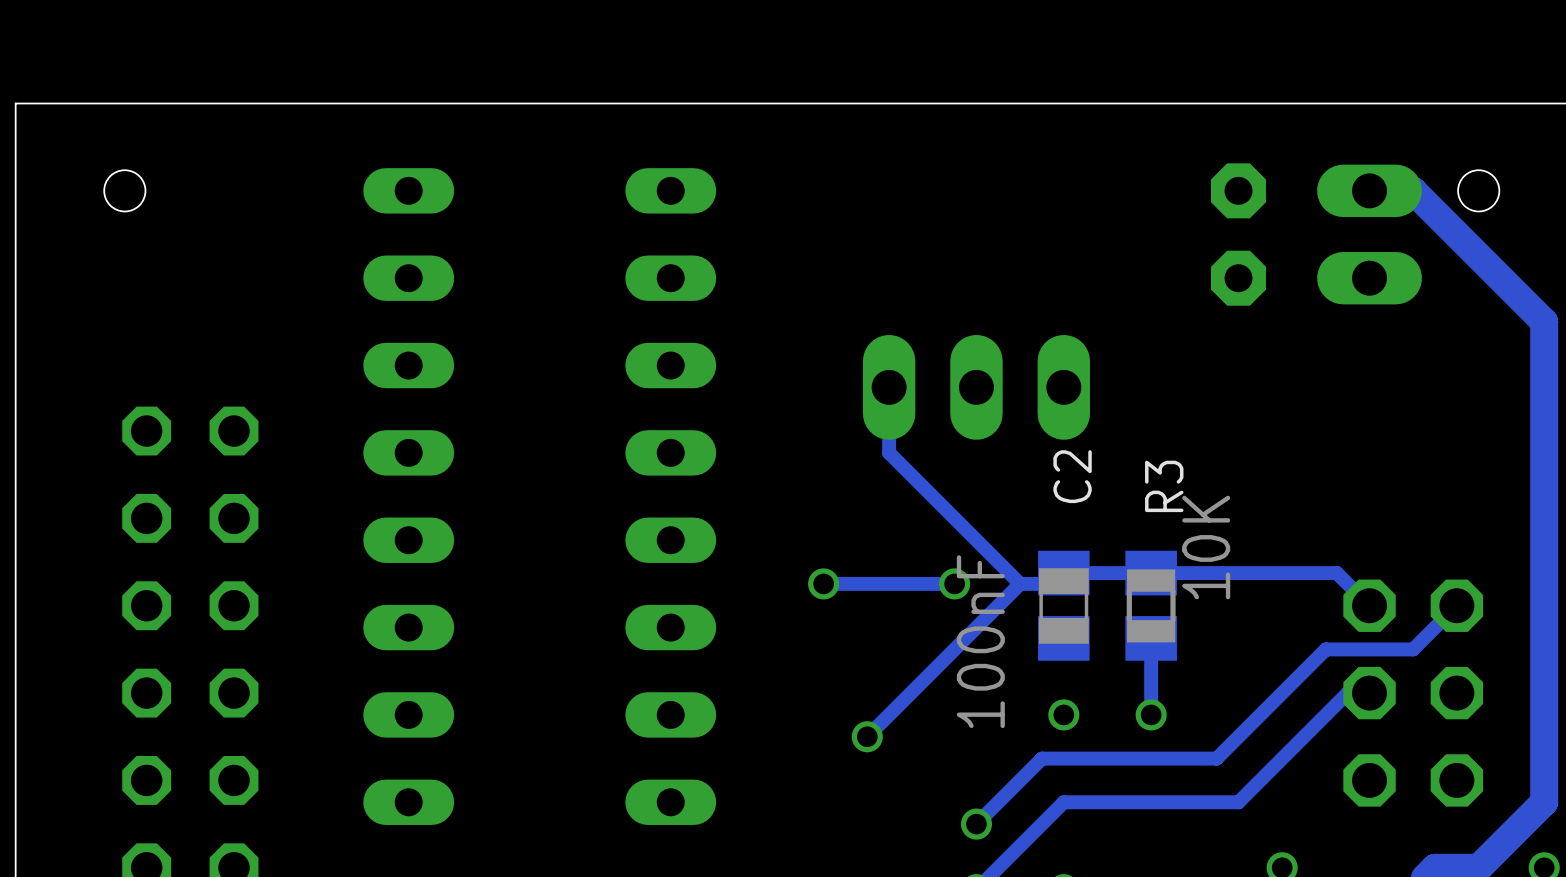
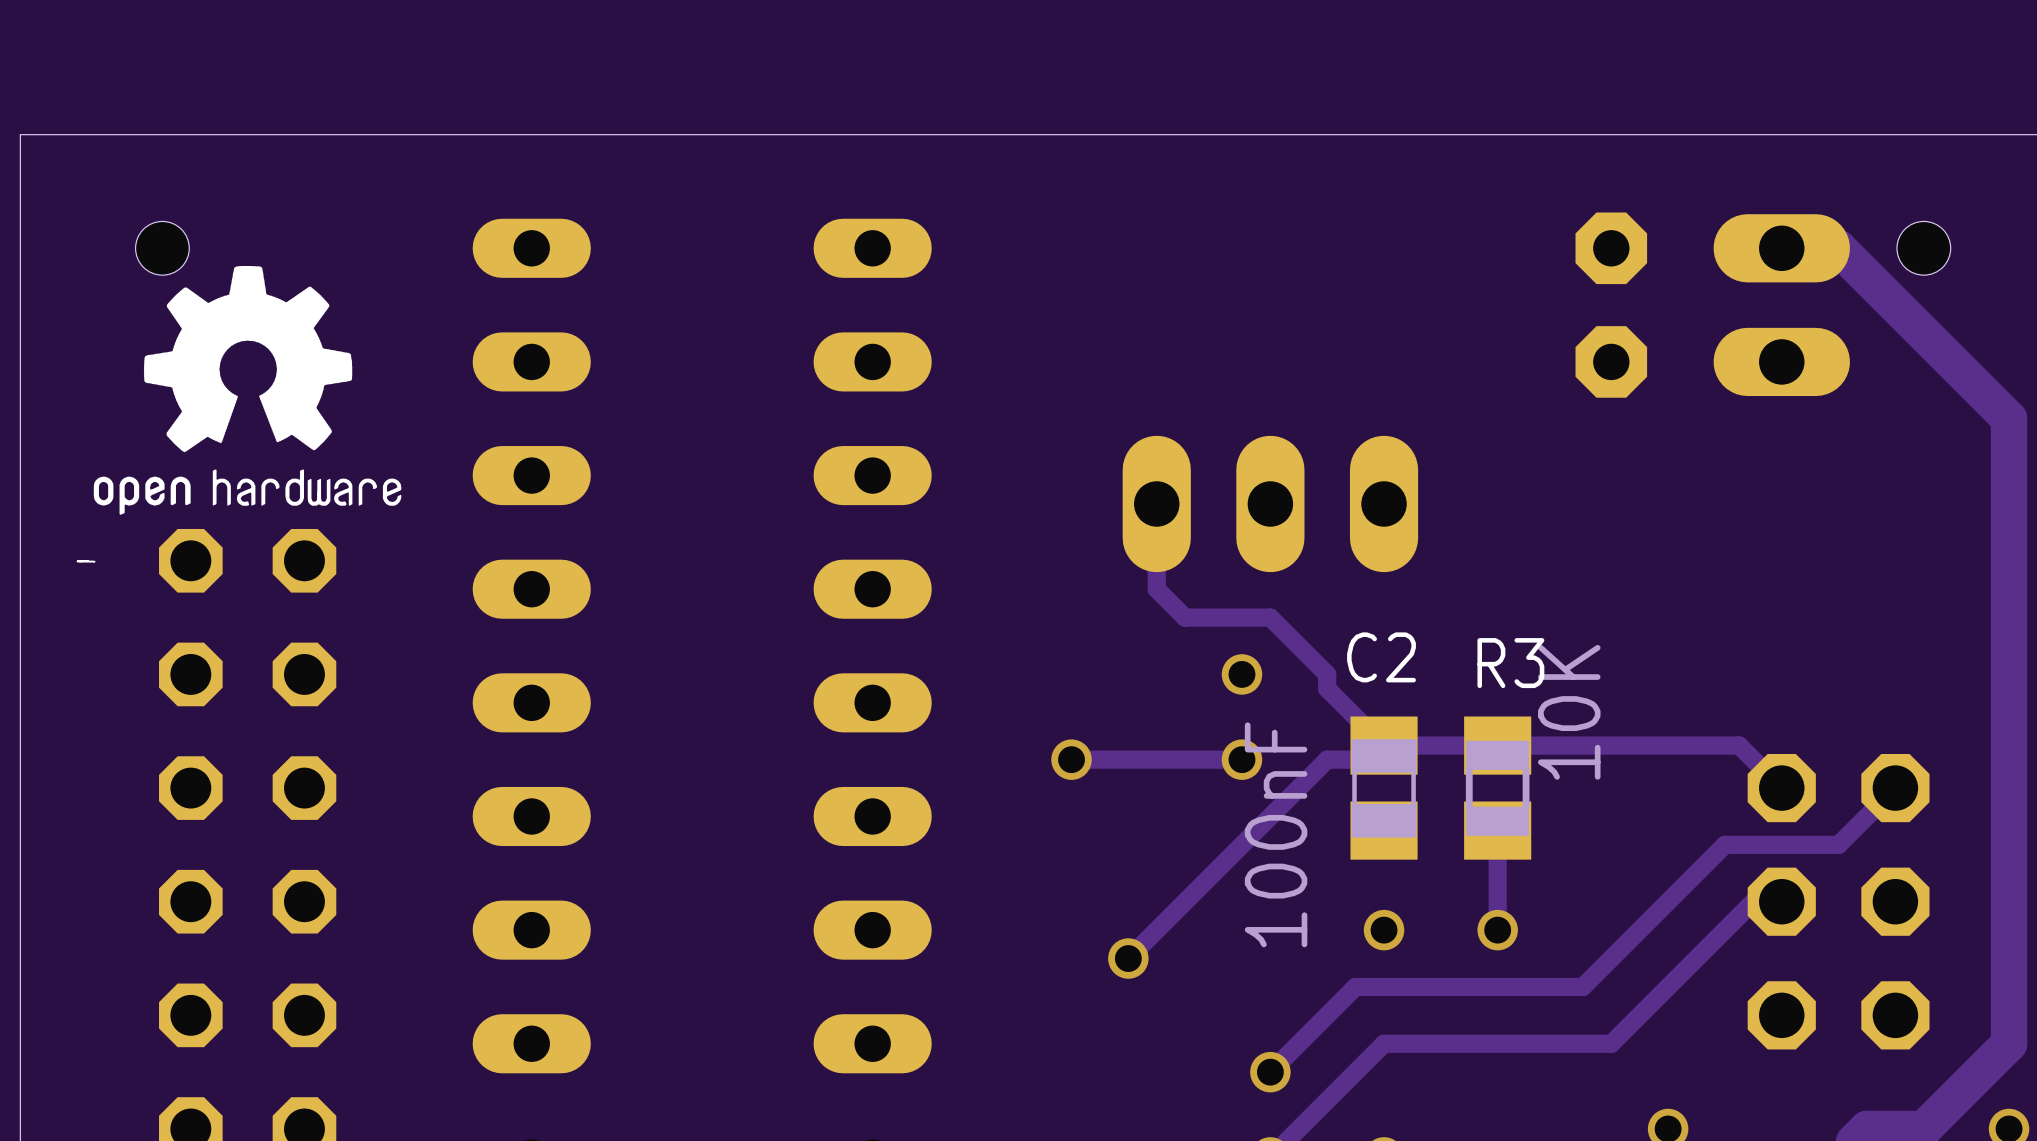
drawing: none -> [93, 265, 402, 515]
track: (910, 474) (1020, 583) -> (1185, 617) (1270, 617) (1327, 674) (1327, 688) (1384, 745)
C2 name rotation: 0° (1072, 476) -> 90° clockwise (1381, 657)
R3 name rotation: 0° (1164, 486) -> 90° clockwise (1510, 663)
via: none -> (1241, 674)

